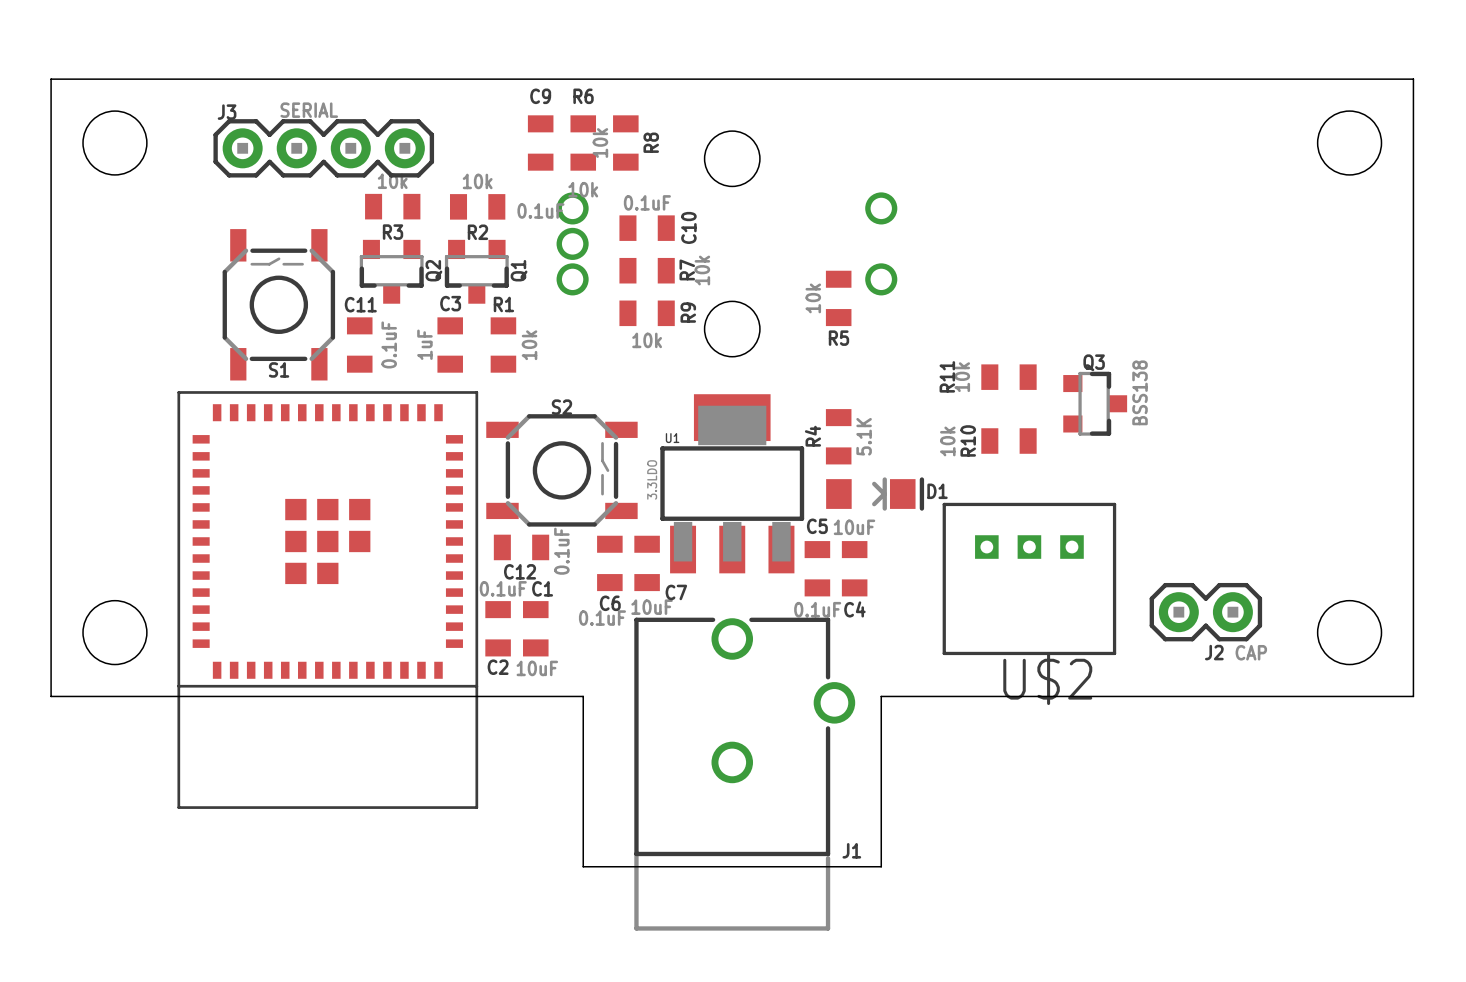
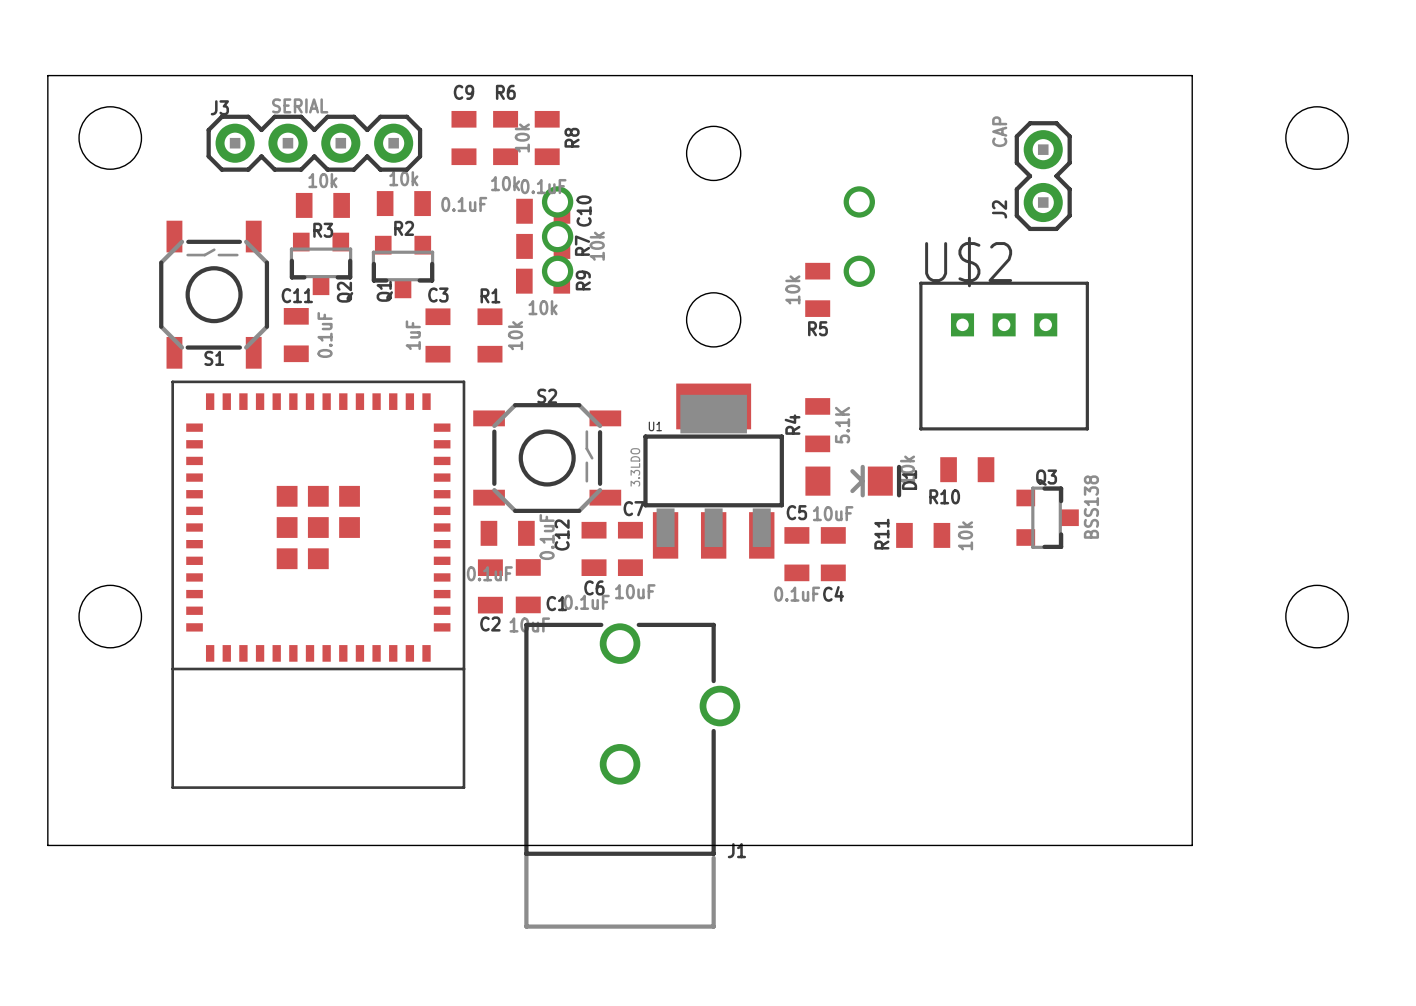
board edge: (1221, 79) (1413, 79) (1413, 696) (881, 696) (881, 866) -> (1192, 75) (1192, 845) (859, 845)
C9 position: (540, 143) -> (463, 138)
R6 position: (583, 143) -> (505, 138)
R8 position: (625, 143) -> (547, 138)
R3 position: (392, 206) -> (322, 205)
R2 position: (477, 206) -> (403, 203)
C10 position: (647, 228) -> (543, 211)
Q2 name position: Q2 (433, 270) -> Q2 (345, 292)
Q1 name position: Q1 (519, 270) -> Q1 (384, 291)
R7 position: (647, 270) -> (543, 246)
Q2 position: (391, 271) -> (321, 263)
Q1 position: (476, 271) -> (403, 267)
S1 position: (278, 304) -> (214, 294)
R9 position: (647, 313) -> (543, 281)
C11 position: (359, 345) -> (296, 335)
R11 name position: R11 (947, 376) -> R11 (881, 534)
R11 value position: 10k (962, 377) -> 10k (965, 535)
R11 position: (1008, 377) -> (923, 535)
Q3 position: (1095, 403) -> (1047, 517)
R10 name rotation: 0° (968, 440) -> 90° clockwise (944, 496)
R10 position: (1008, 441) -> (967, 469)
D1 name rotation: 0° (937, 491) -> 90° counterclockwise (909, 480)
C12 name rotation: 0° (520, 571) -> 90° counterclockwise (562, 535)
C12 name position: C12 (520, 571) -> C12 (562, 535)
U$2 position: (1029, 578) -> (1004, 356)
C1 name position: C1 (542, 588) -> C1 (556, 603)
C7 name position: C7 (676, 592) -> C7 (634, 508)
J2 rotation: 0° (1205, 612) -> 90° clockwise (1043, 176)
J2 position: (1205, 612) -> (1043, 176)
C2 position: (498, 628) -> (490, 586)
C1 position: (535, 628) -> (528, 586)
J2 value position: CAP (1251, 652) -> CAP (999, 131)
U$2 name position: U$2 (1047, 679) -> U$2 (968, 262)
board edge: (51, 696) (583, 696) (583, 866) -> (47, 678) (47, 845) (568, 845)
J1 position: (744, 774) -> (632, 775)

